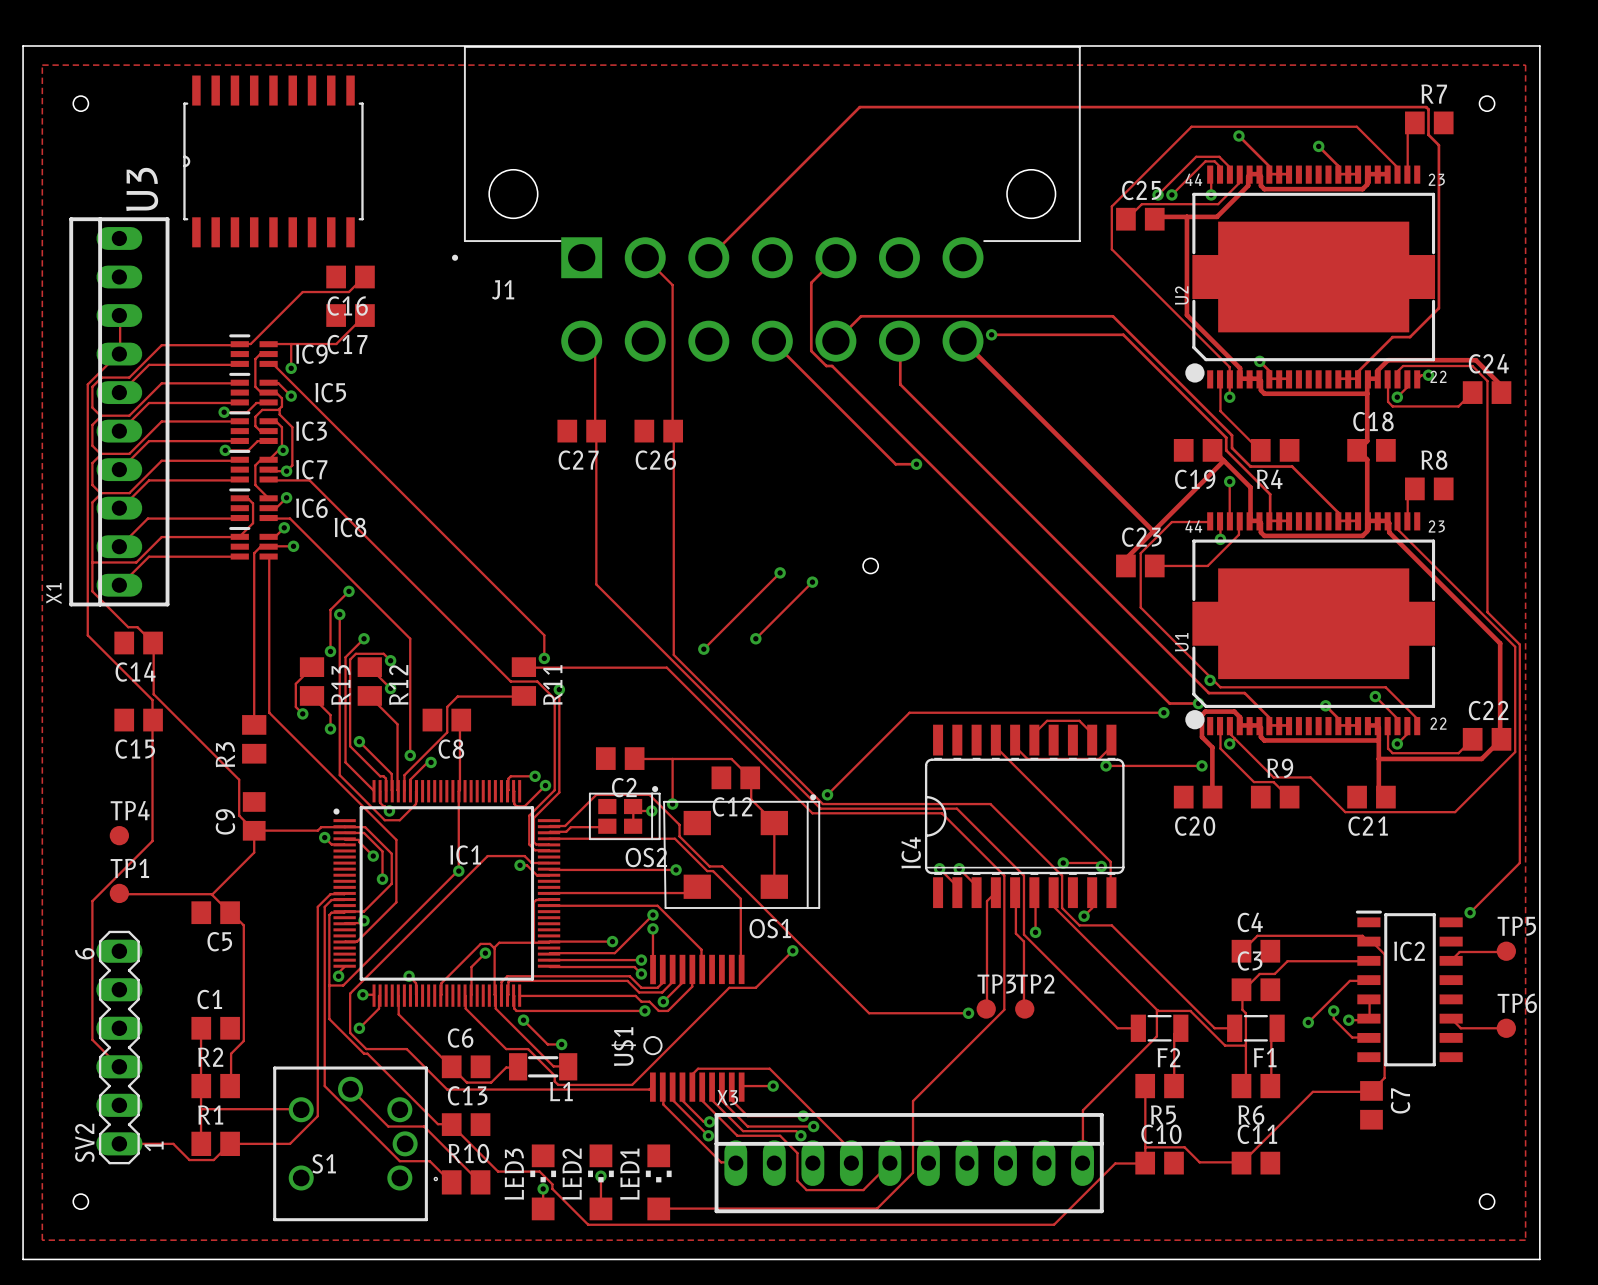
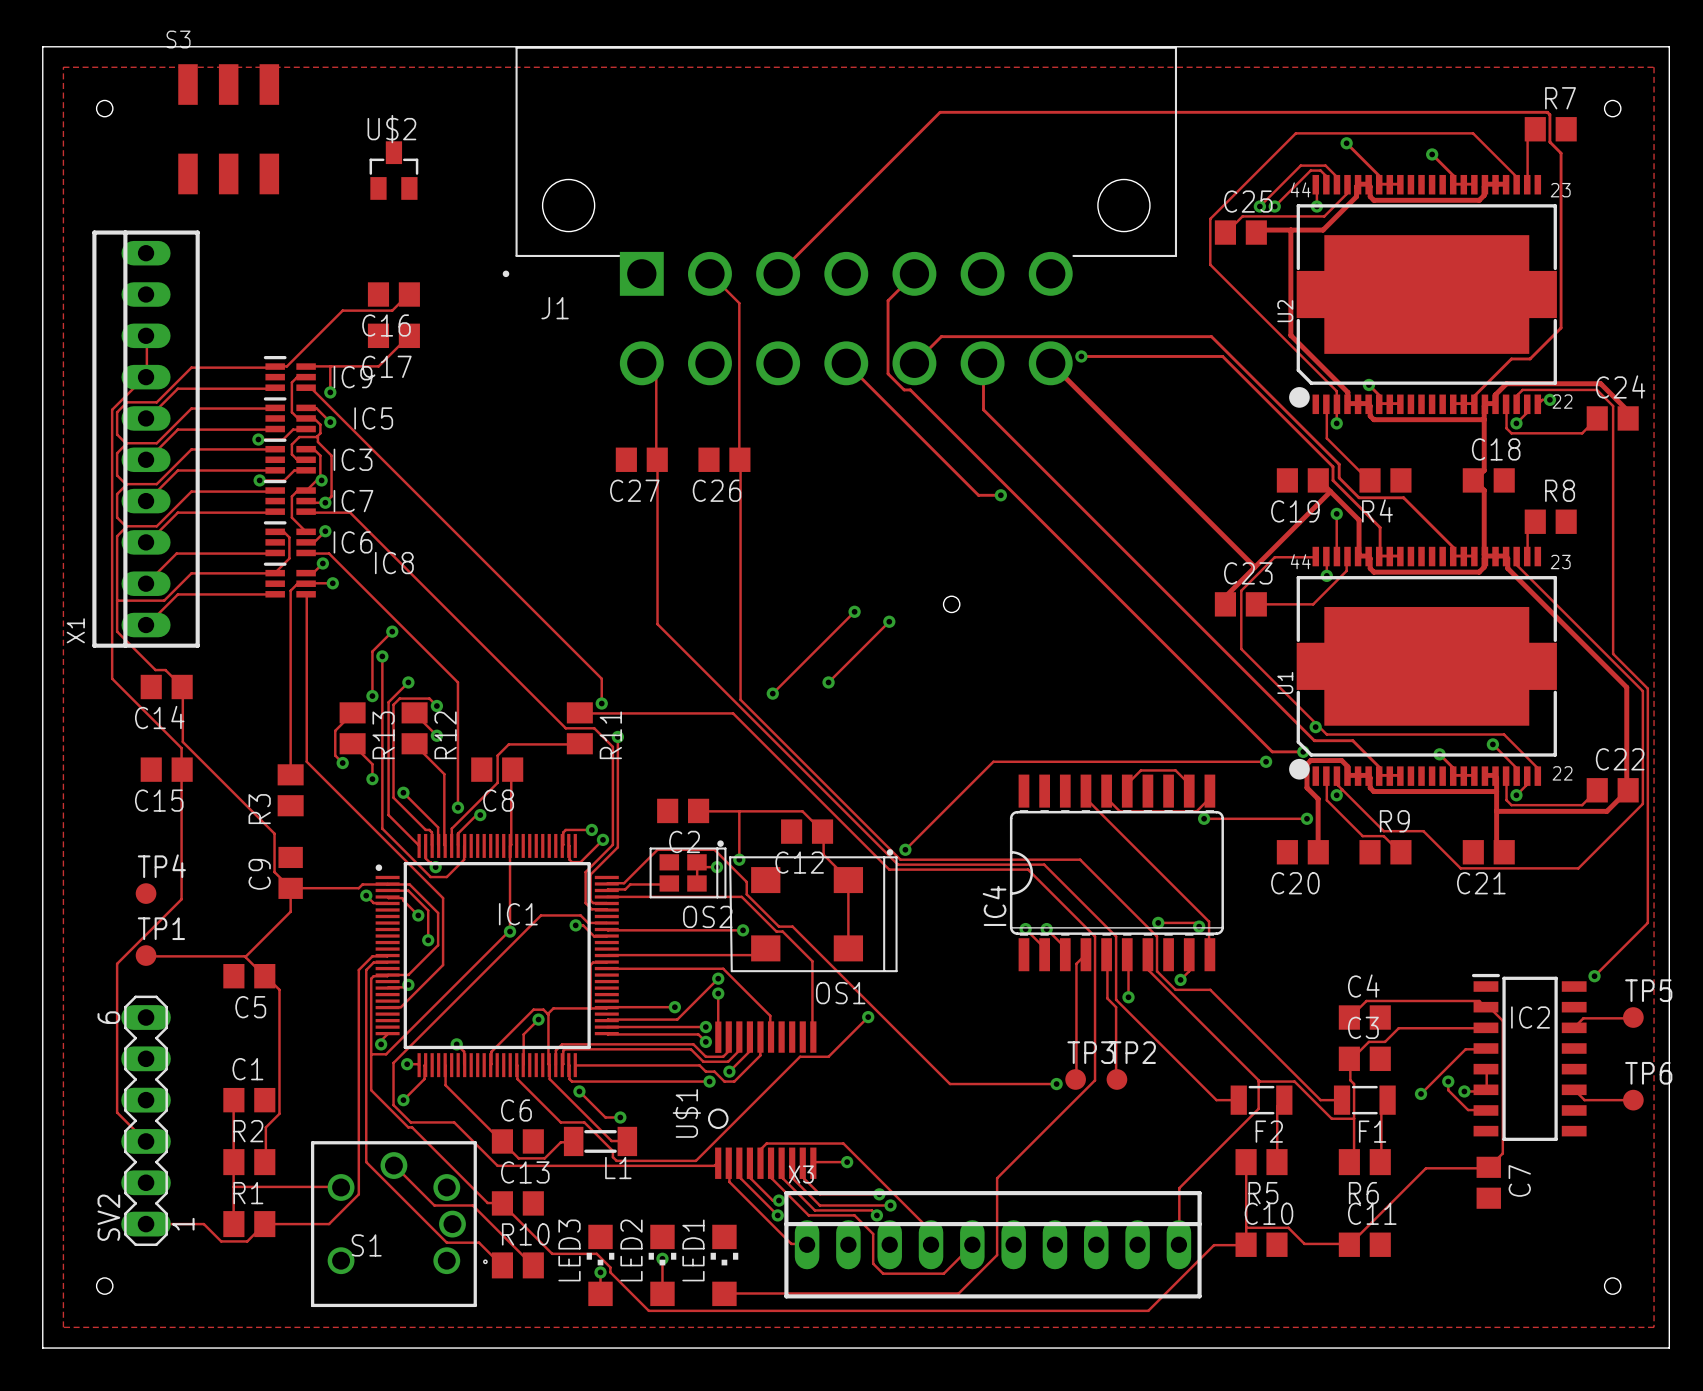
S3: none -> (228, 129)
U3: (273, 161) -> none
U$2: none -> (393, 170)

